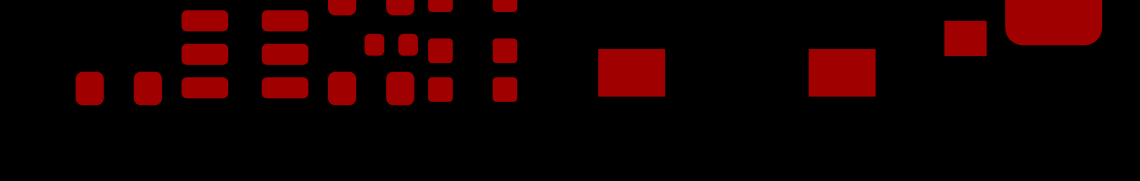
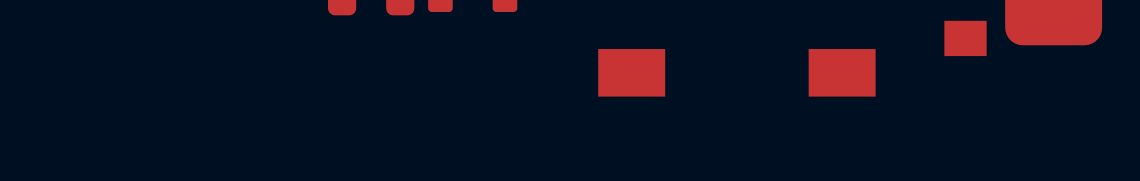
part: (391, 44) -> none
part: (244, 54) -> none
part: (472, 70) -> none
part: (118, 88) -> none
part: (371, 88) -> none

